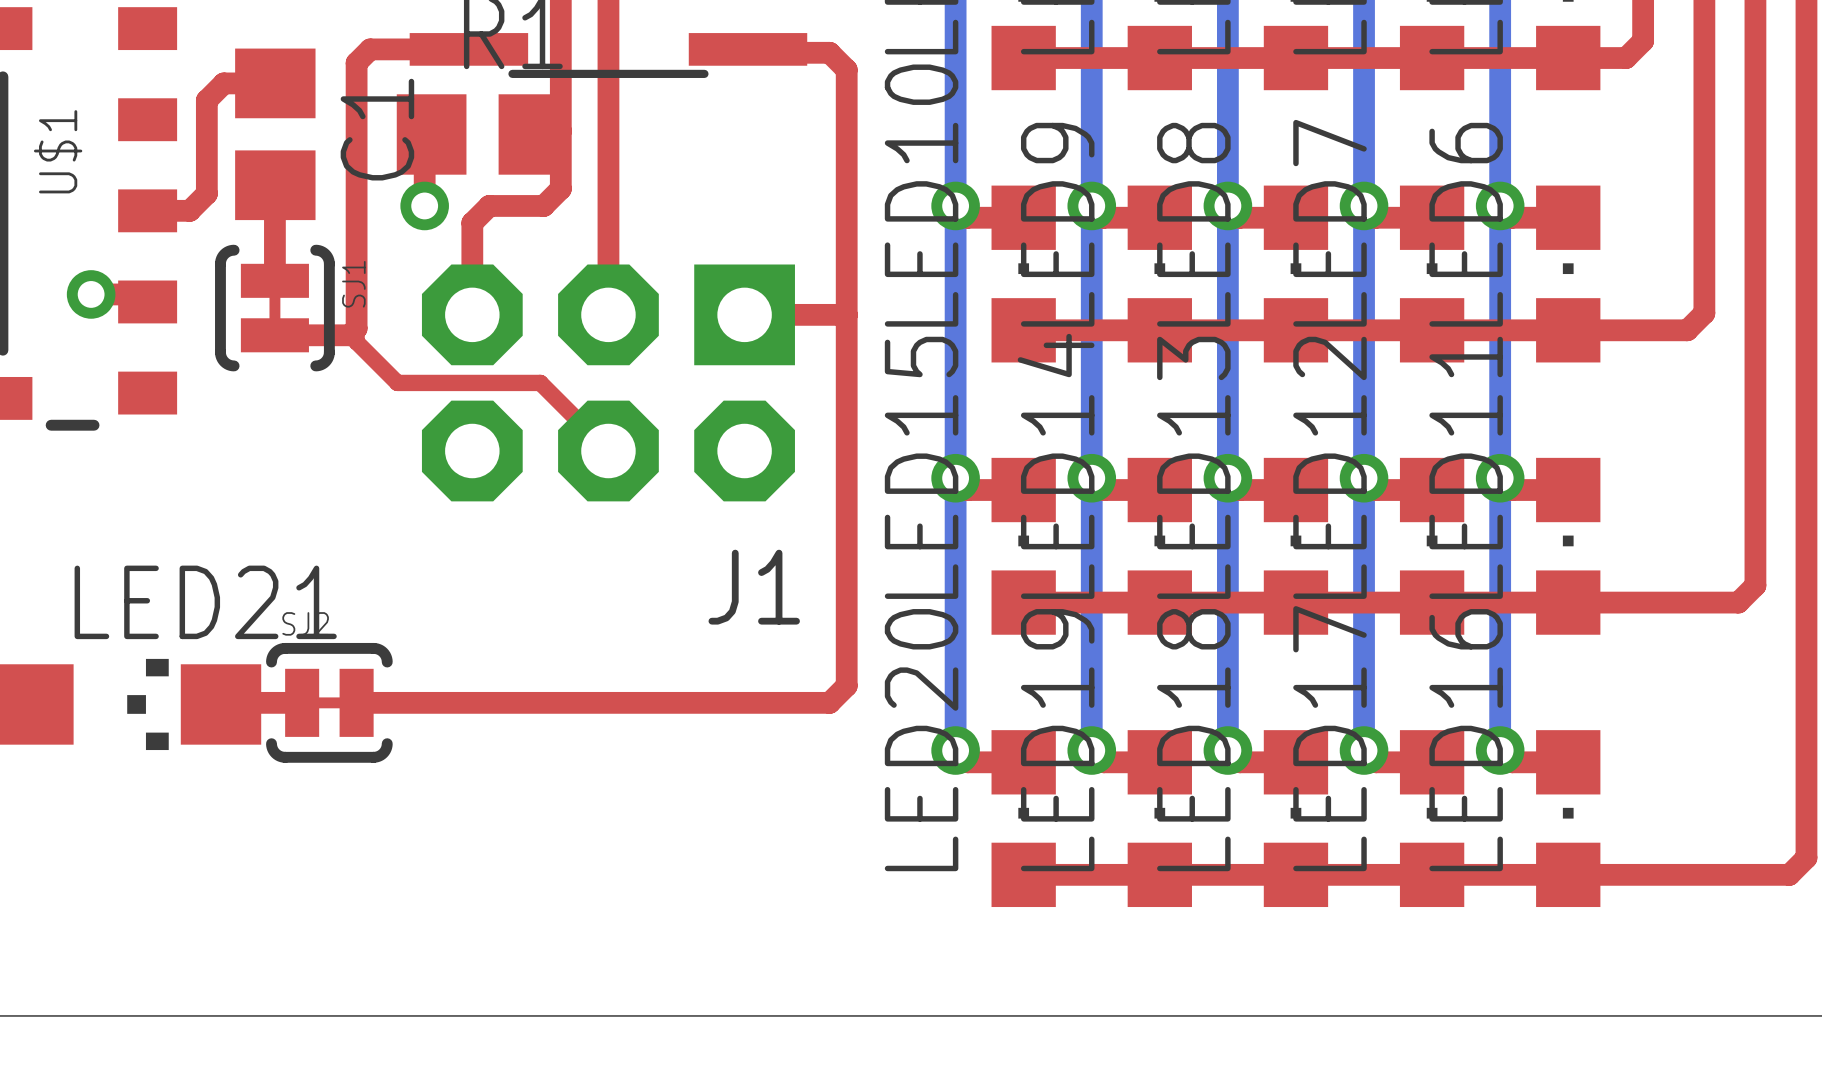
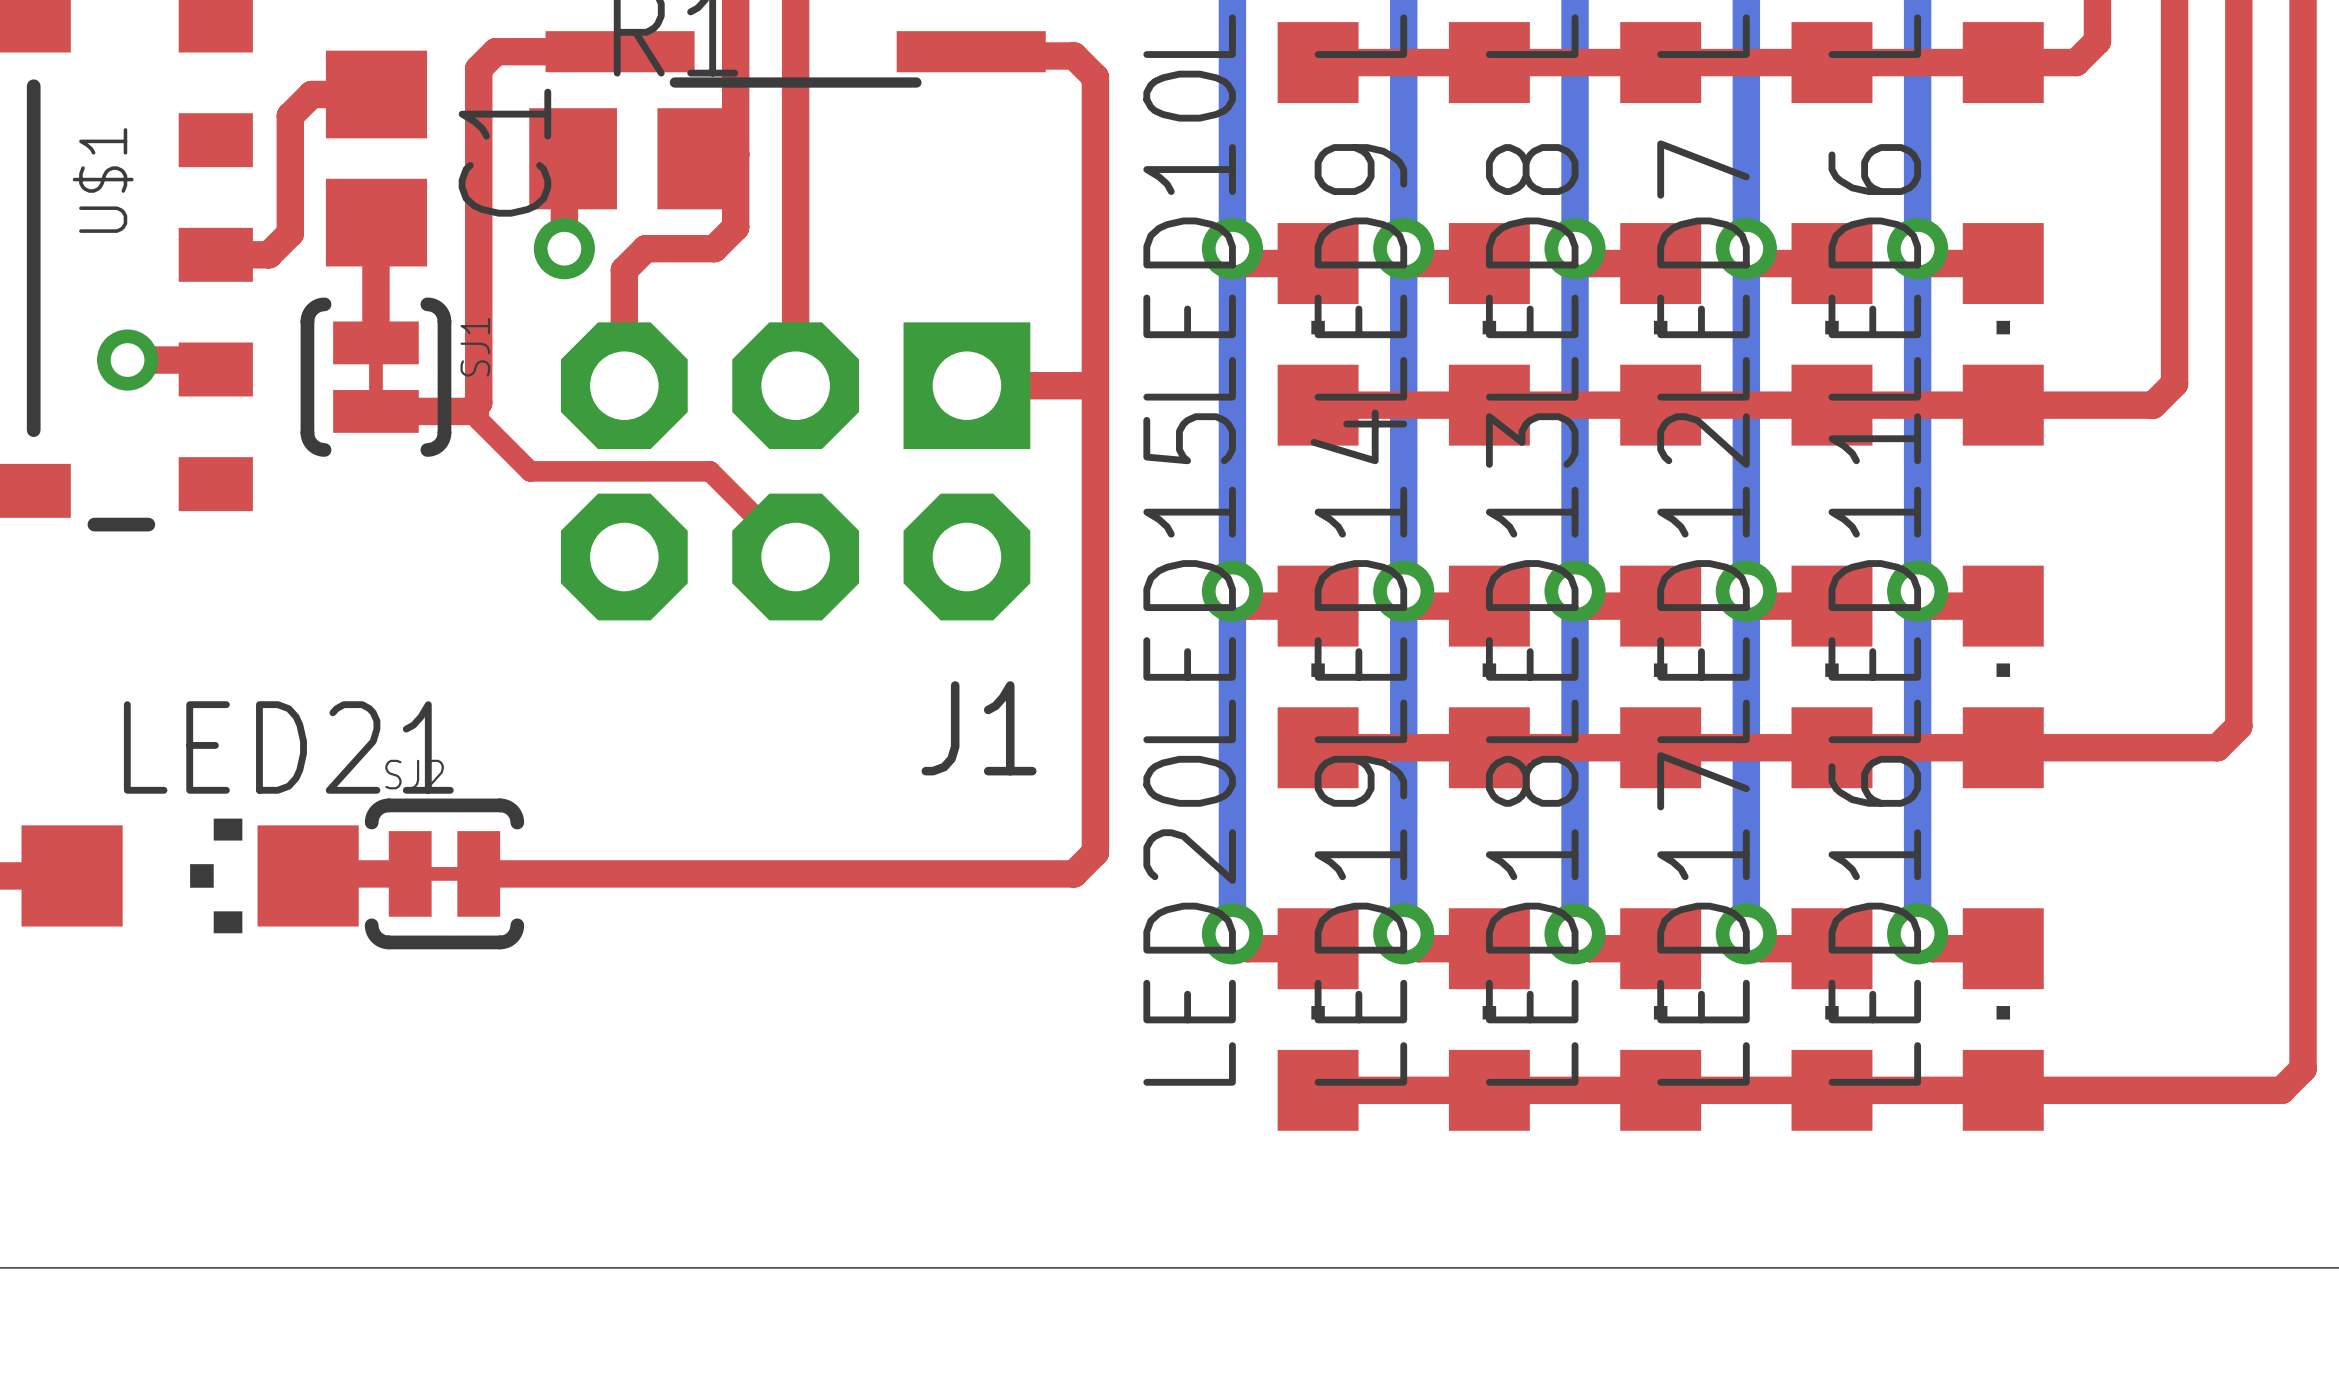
via position: (91, 294) -> (127, 360)

